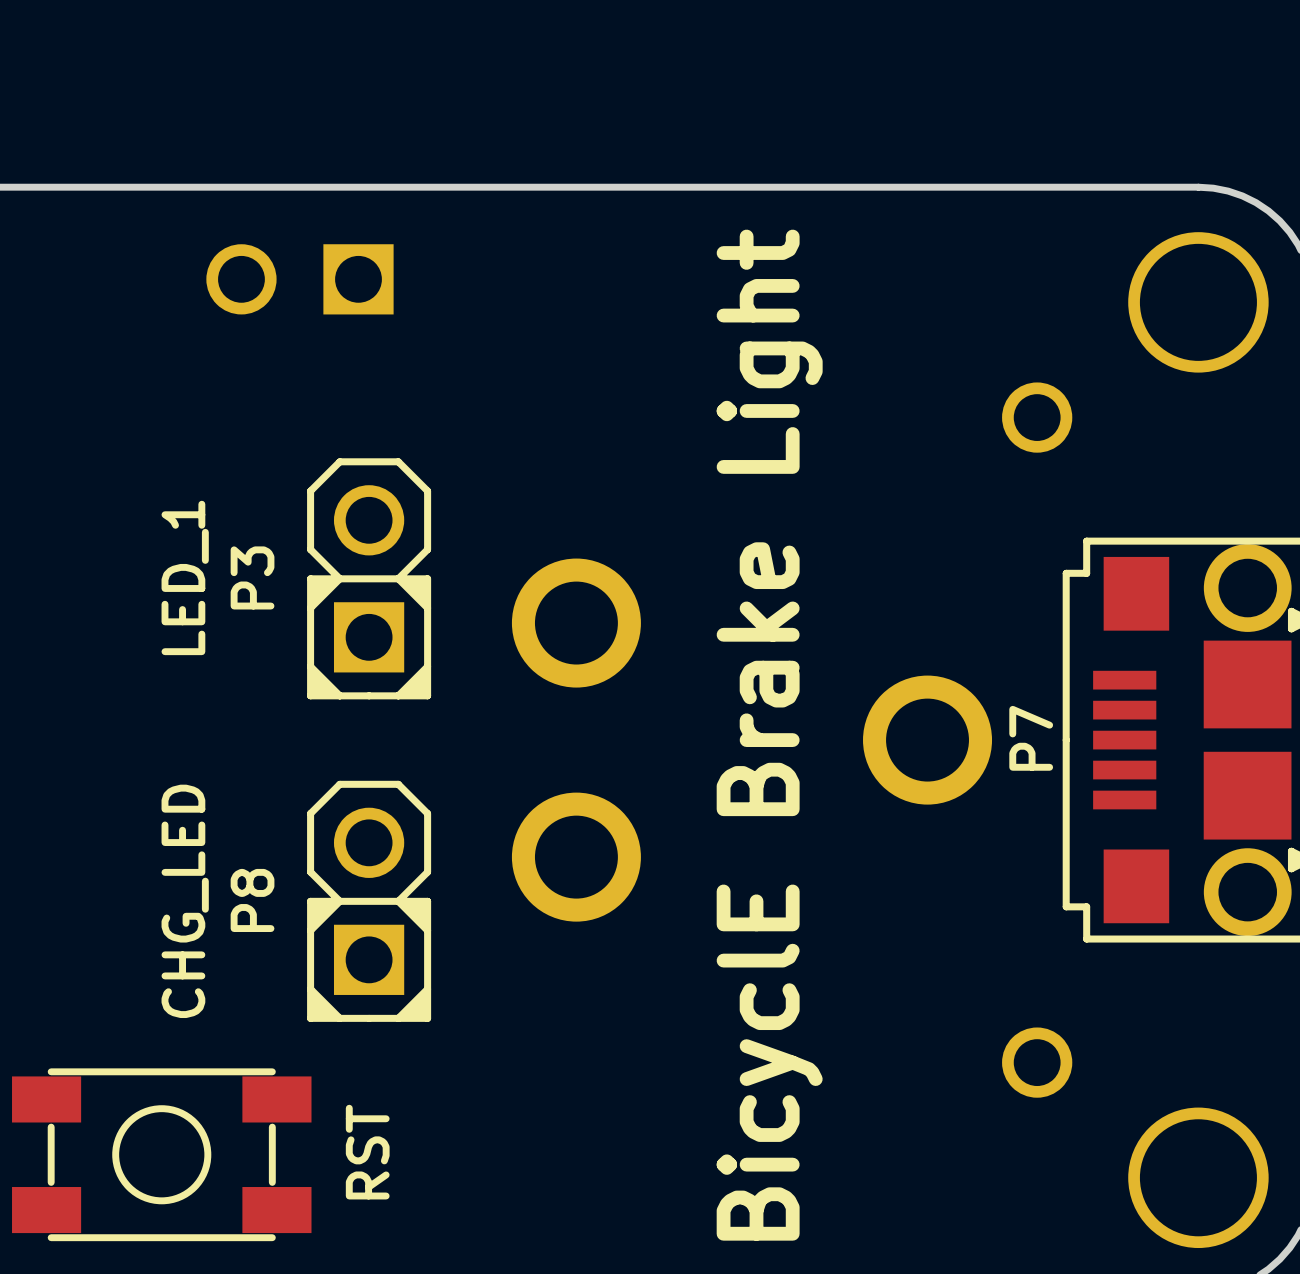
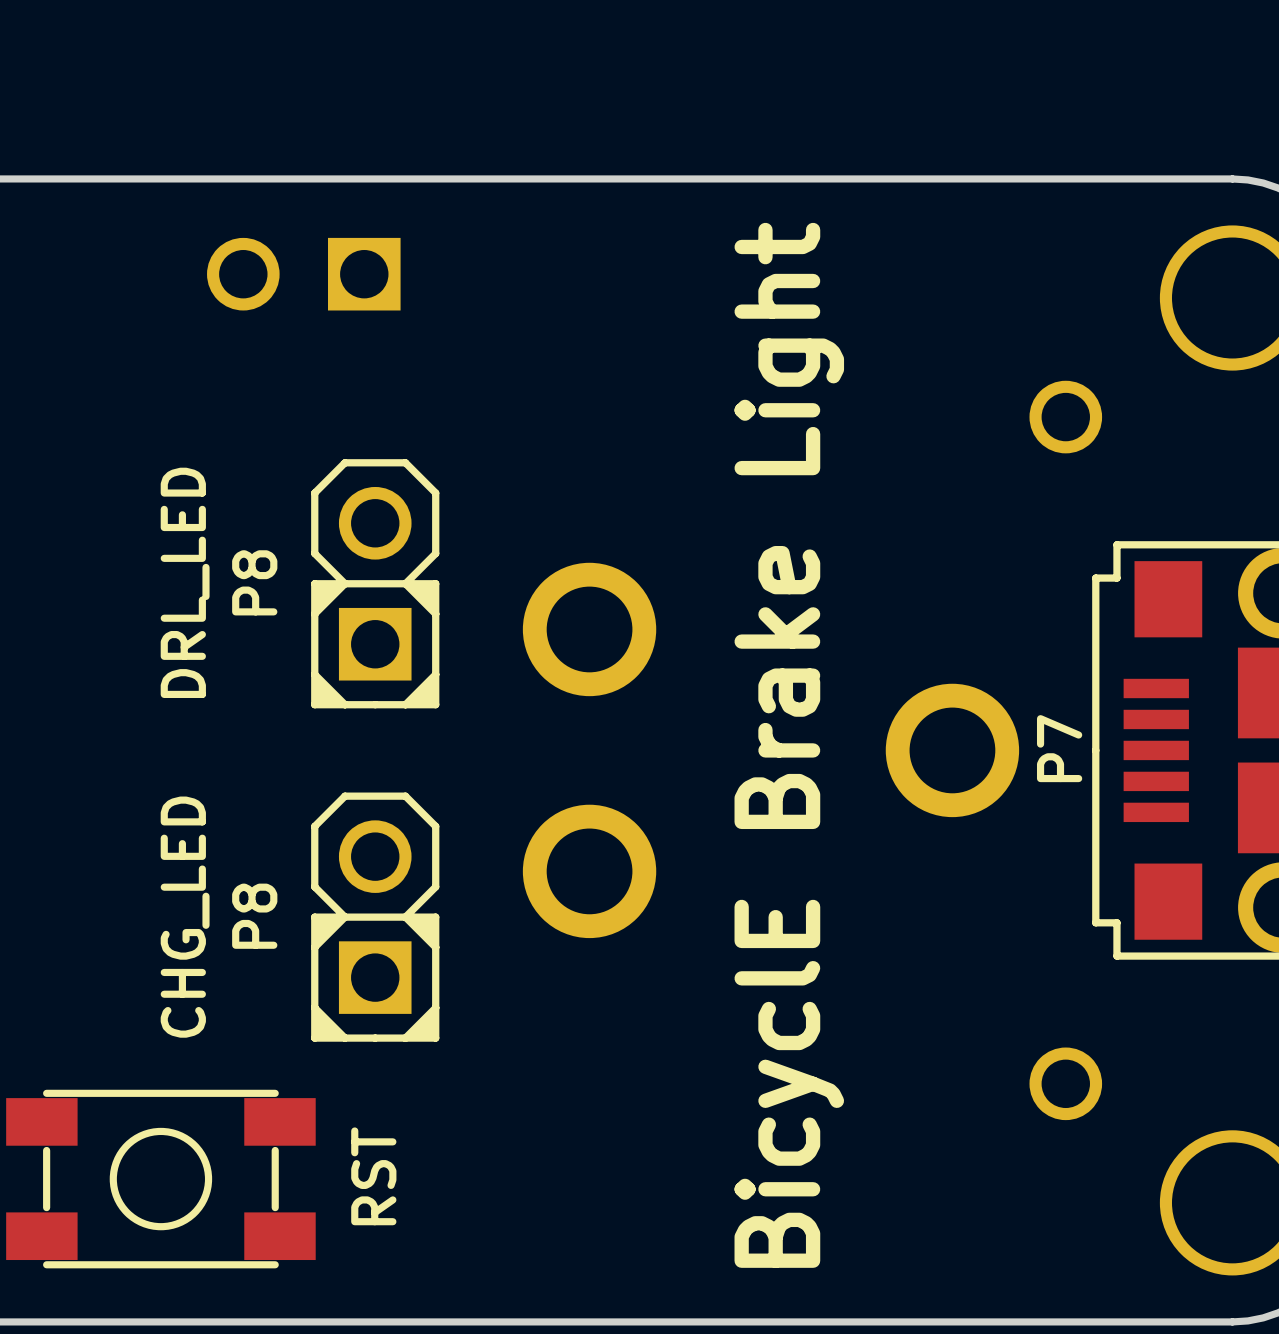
P3 value: LED_1 (185, 577) -> DRL_LED (185, 582)
P3 name: P3 (252, 577) -> P8 (254, 582)

